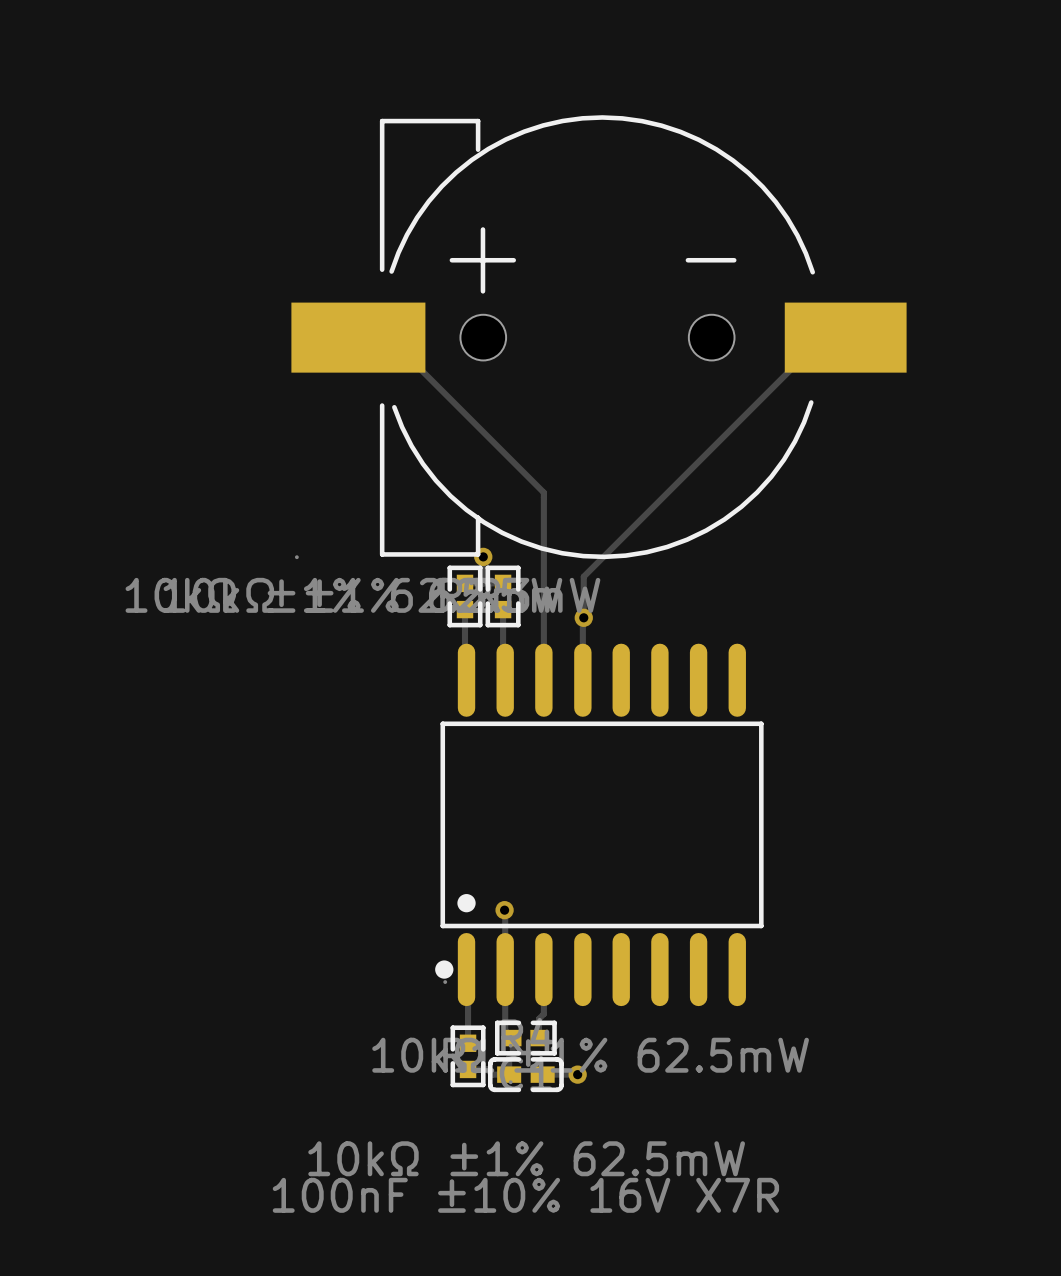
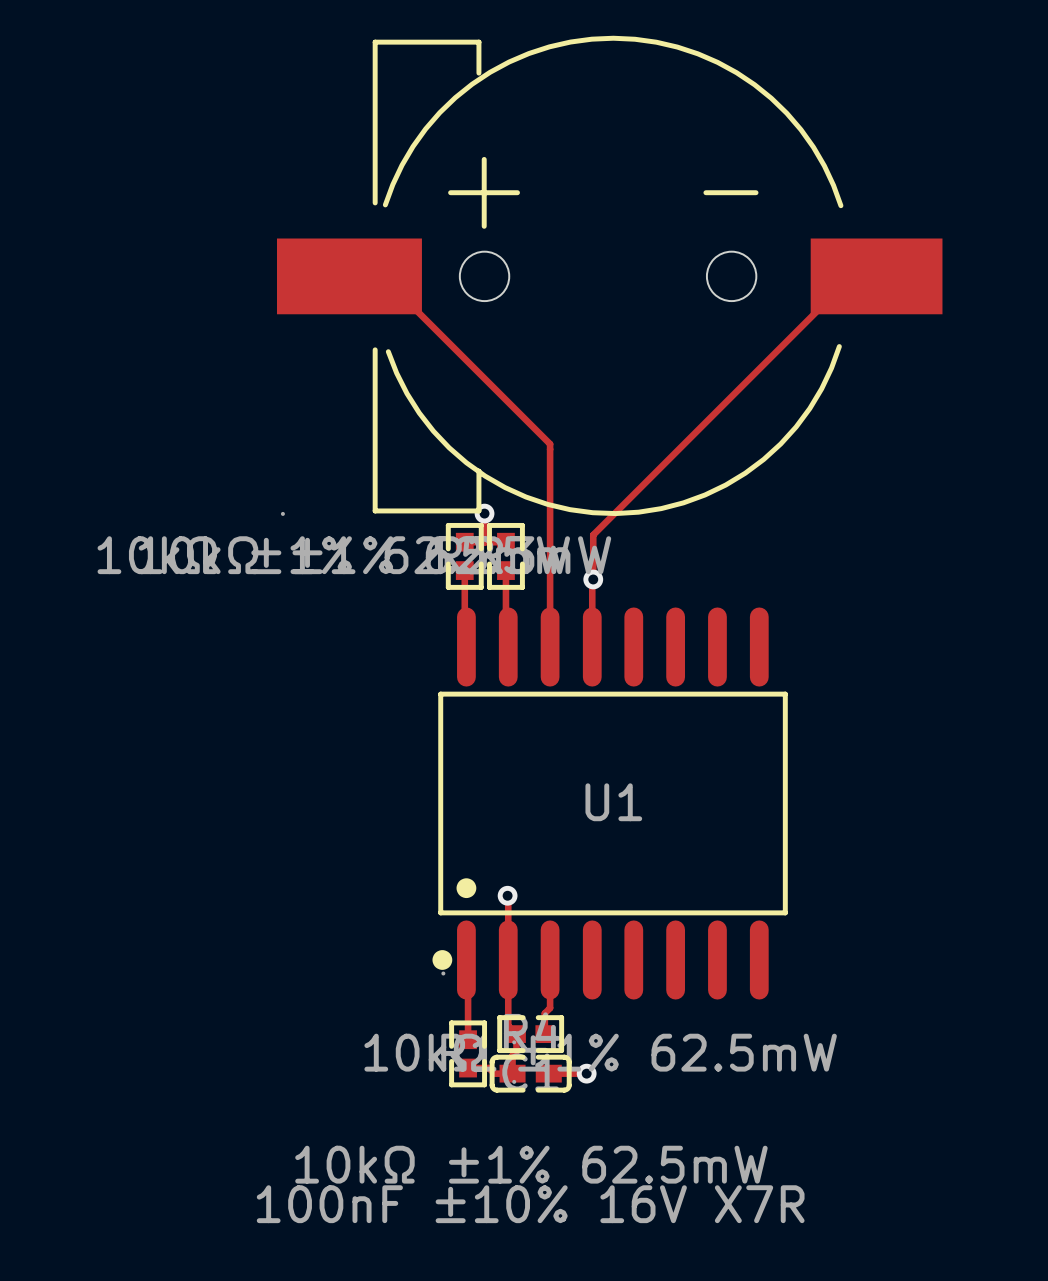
U1 name: none -> U1 (613, 802)

